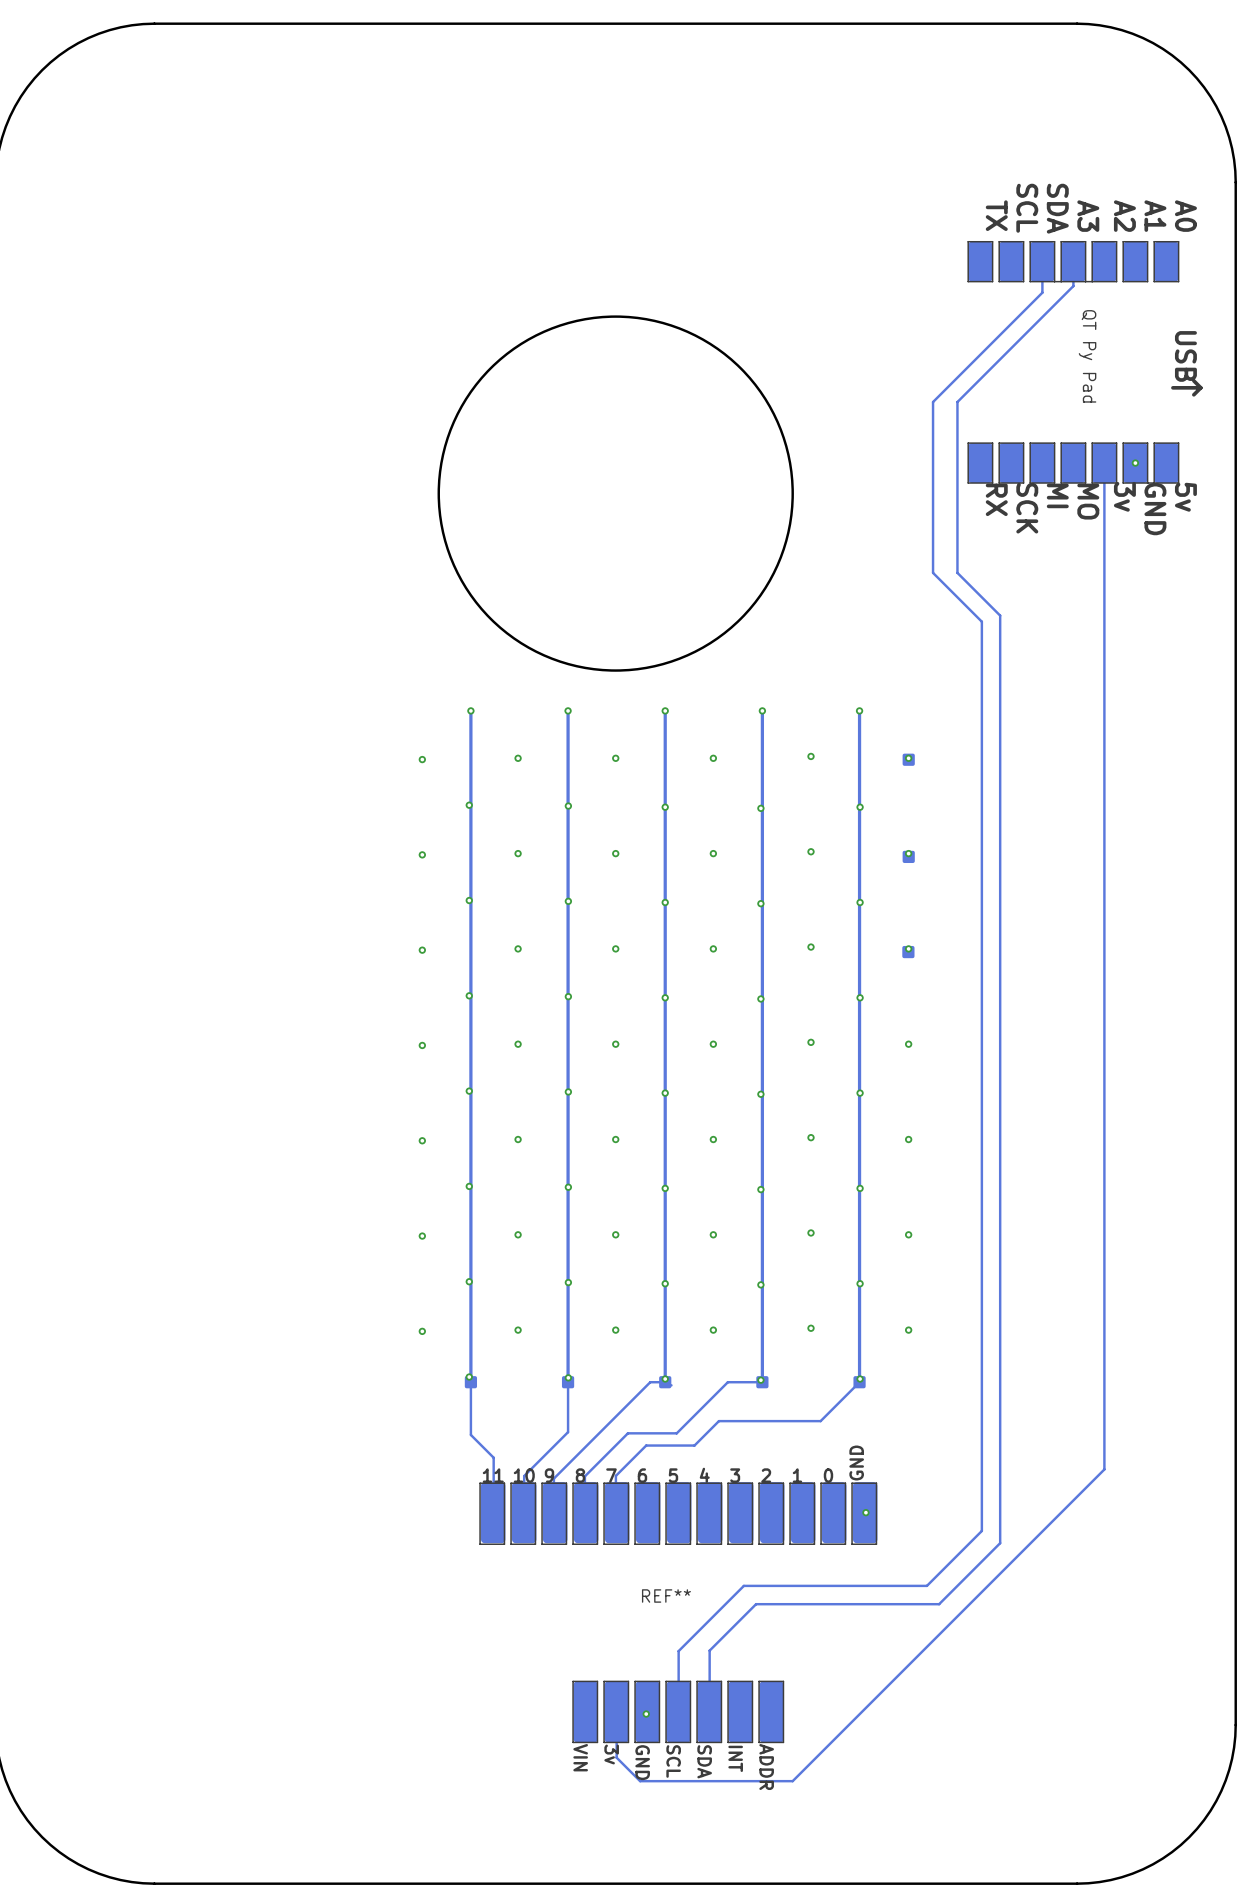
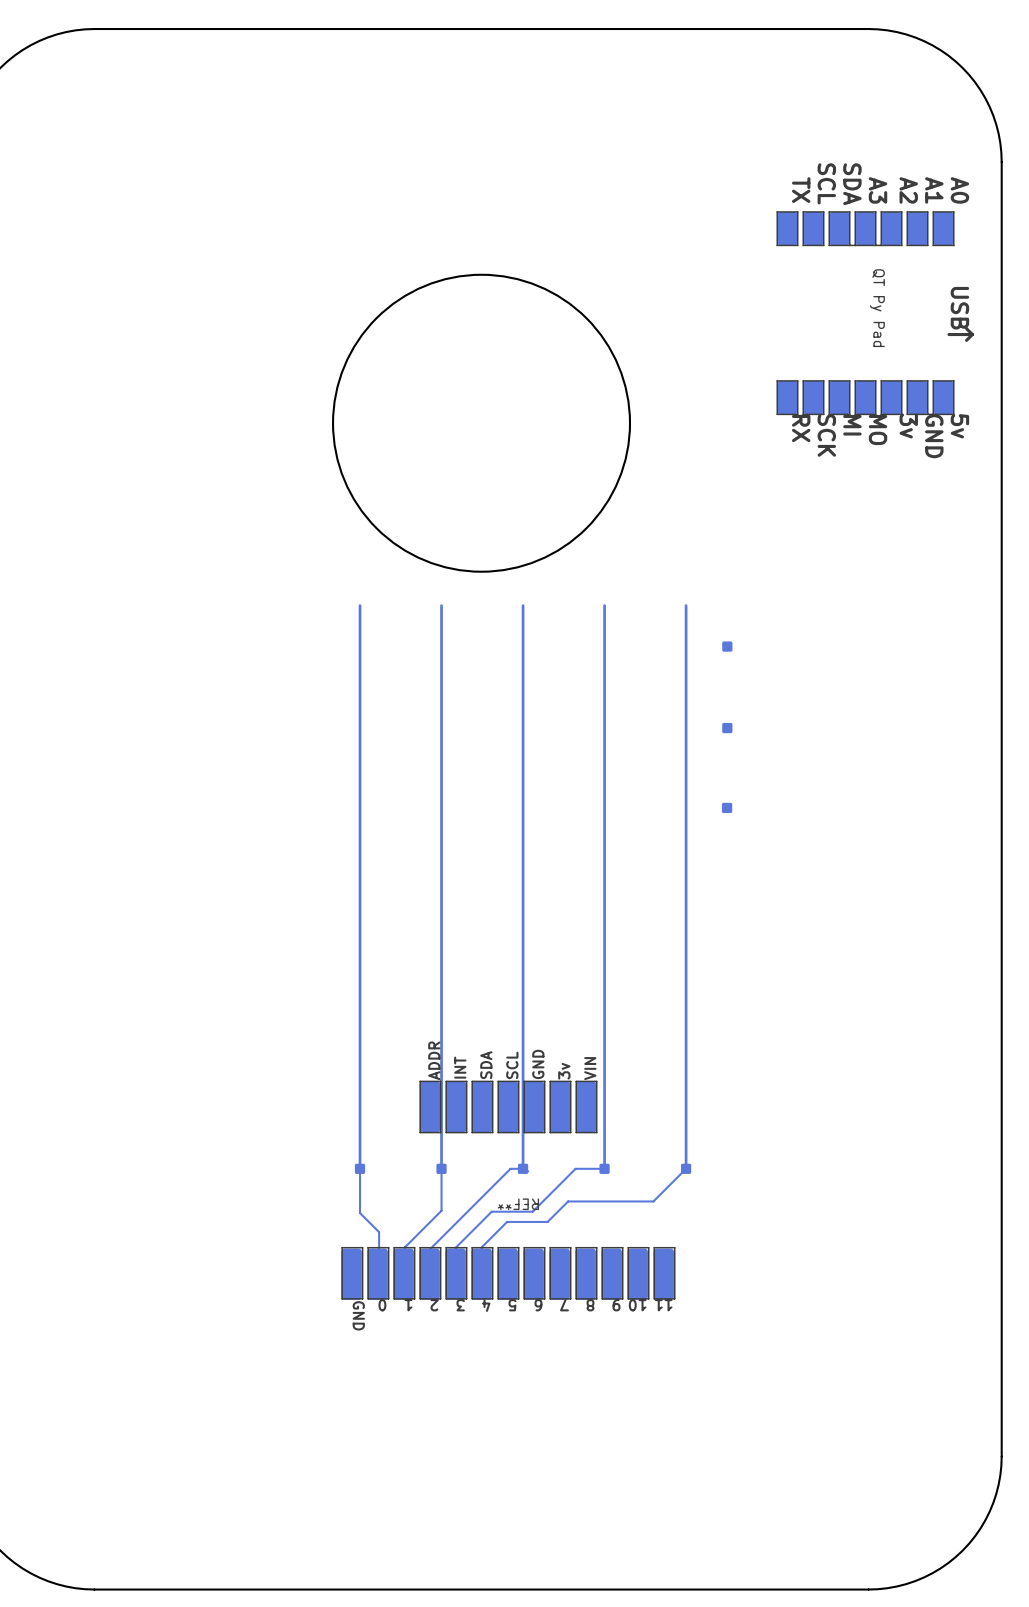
track: (1073, 261) (1073, 286) (957, 402) (957, 572) (1000, 615) (1000, 1543) (939, 1604) (756, 1604) (709, 1650) (709, 1711) -> none
track: (1036, 267) (1042, 261) (1042, 292) (933, 402) (933, 572) (981, 621) (981, 1530) (926, 1585) (743, 1585) (678, 1651) (678, 1711) -> none
track: (1104, 463) (1104, 1469) (792, 1781) (640, 1781) (616, 1757) (616, 1711) -> none
via: (1135, 463) -> none
via: (470, 710) -> none
via: (568, 710) -> none
via: (665, 710) -> none
via: (762, 710) -> none
via: (859, 710) -> none
via: (811, 756) -> none
via: (518, 758) -> none
via: (615, 758) -> none
via: (713, 758) -> none
via: (908, 758) -> none
via: (422, 759) -> none
via: (469, 805) -> none
via: (568, 806) -> none
via: (665, 807) -> none
via: (860, 807) -> none
via: (760, 808) -> none
via: (811, 851) -> none
via: (518, 853) -> none
via: (615, 853) -> none
via: (713, 853) -> none
via: (908, 853) -> none
via: (422, 854) -> none
via: (469, 900) -> none
via: (568, 901) -> none
via: (665, 902) -> none
via: (860, 902) -> none
via: (760, 903) -> none
via: (811, 947) -> none
via: (518, 948) -> none
via: (615, 948) -> none
via: (713, 948) -> none
via: (908, 948) -> none
via: (422, 950) -> none
via: (469, 995) -> none
via: (568, 996) -> none
via: (665, 997) -> none
via: (860, 997) -> none
via: (760, 998) -> none
via: (811, 1042) -> none
via: (518, 1044) -> none
via: (615, 1044) -> none
via: (713, 1044) -> none
via: (908, 1044) -> none
via: (422, 1045) -> none
via: (469, 1091) -> none
via: (568, 1091) -> none
via: (665, 1093) -> none
via: (860, 1093) -> none
via: (760, 1094) -> none
via: (811, 1137) -> none
via: (518, 1139) -> none
via: (615, 1139) -> none
via: (713, 1139) -> none
via: (908, 1139) -> none
via: (422, 1140) -> none
via: (469, 1186) -> none
via: (568, 1187) -> none
via: (665, 1188) -> none
via: (860, 1188) -> none
via: (760, 1189) -> none
via: (811, 1232) -> none
via: (518, 1234) -> none
via: (615, 1234) -> none
via: (713, 1234) -> none
via: (908, 1234) -> none
via: (422, 1236) -> none
via: (469, 1281) -> none
via: (568, 1282) -> none
via: (665, 1283) -> none
via: (860, 1283) -> none
via: (760, 1284) -> none
via: (811, 1328) -> none
via: (518, 1330) -> none
via: (615, 1330) -> none
via: (713, 1330) -> none
via: (908, 1330) -> none
via: (422, 1331) -> none
via: (469, 1377) -> none
via: (568, 1377) -> none
via: (665, 1379) -> none
via: (860, 1379) -> none
via: (760, 1380) -> none
via: (865, 1512) -> none
REF** rotation: 0° (678, 1612) -> 180° (508, 1190)
via: (646, 1714) -> none

